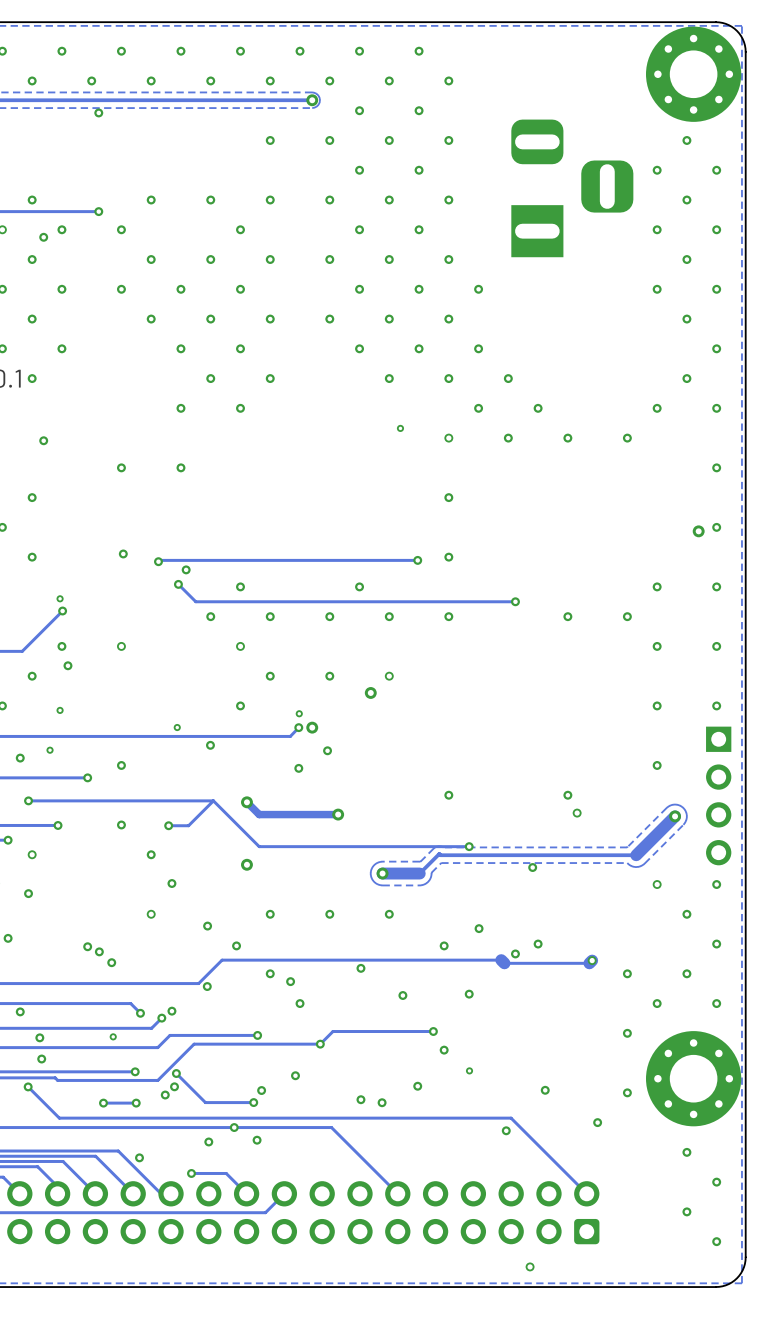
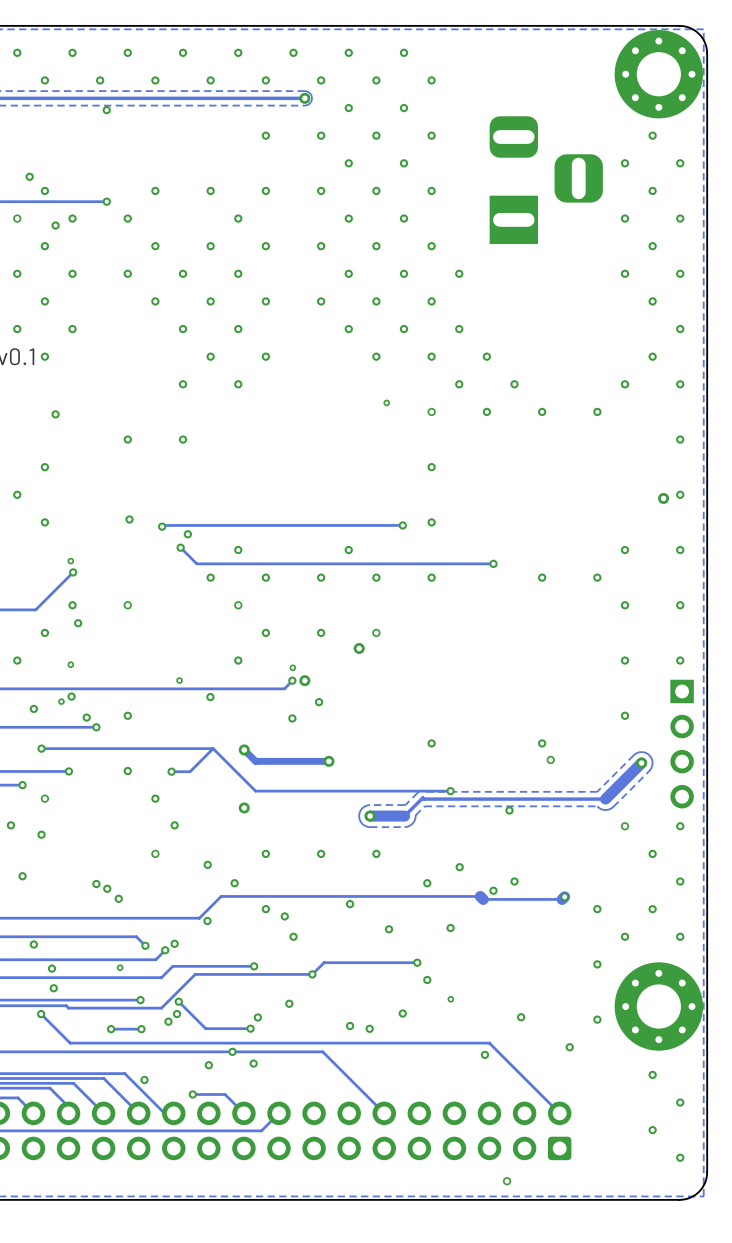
via: none -> (29, 176)
via: none -> (71, 696)
via: none -> (86, 717)

